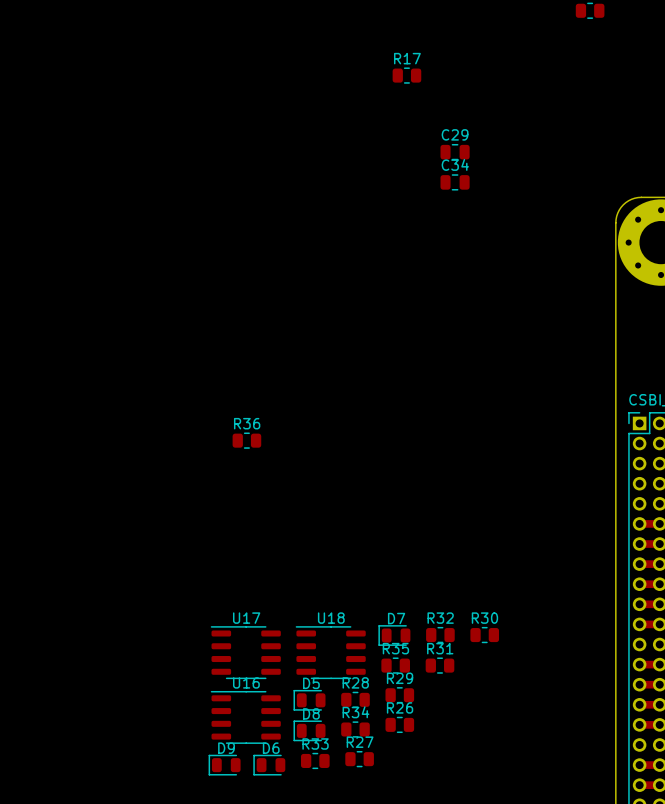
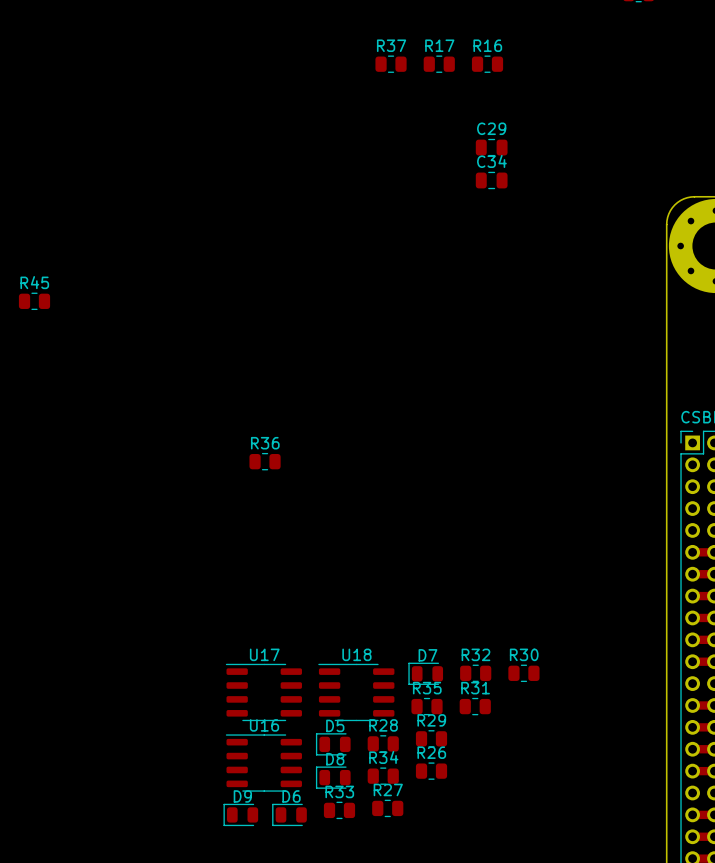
R37: none -> (391, 64)
R16: none -> (487, 64)
R45: none -> (34, 301)

